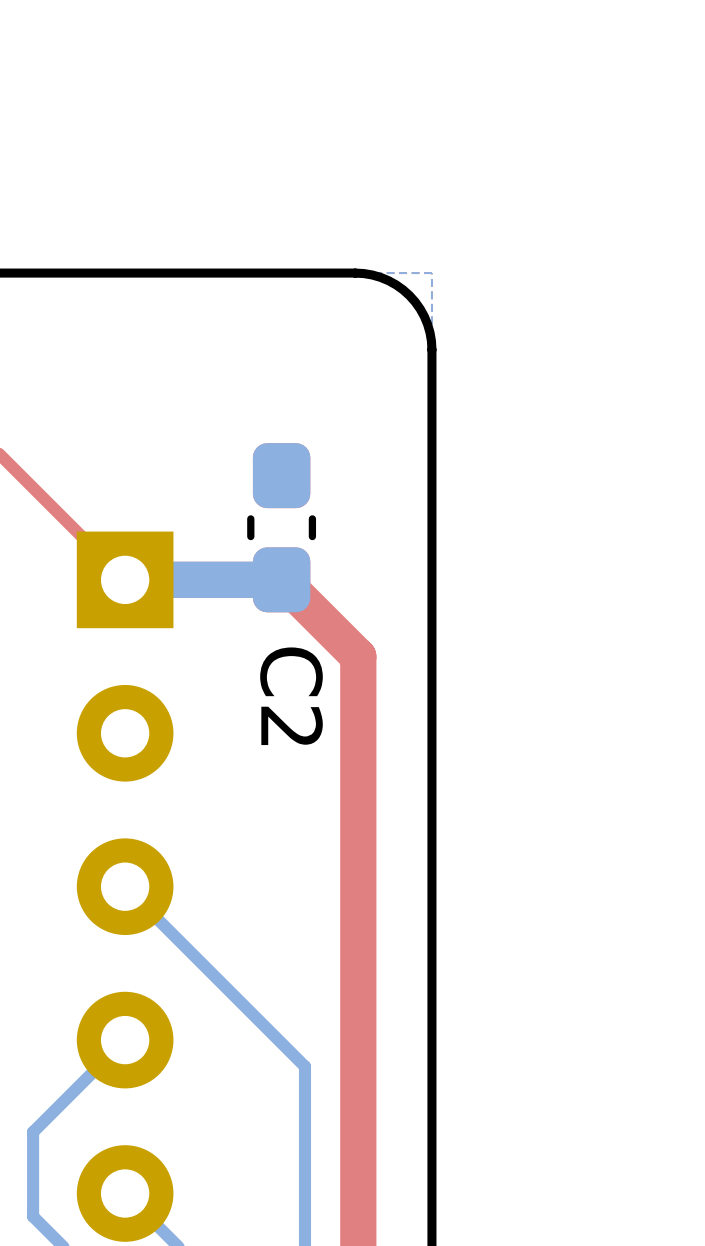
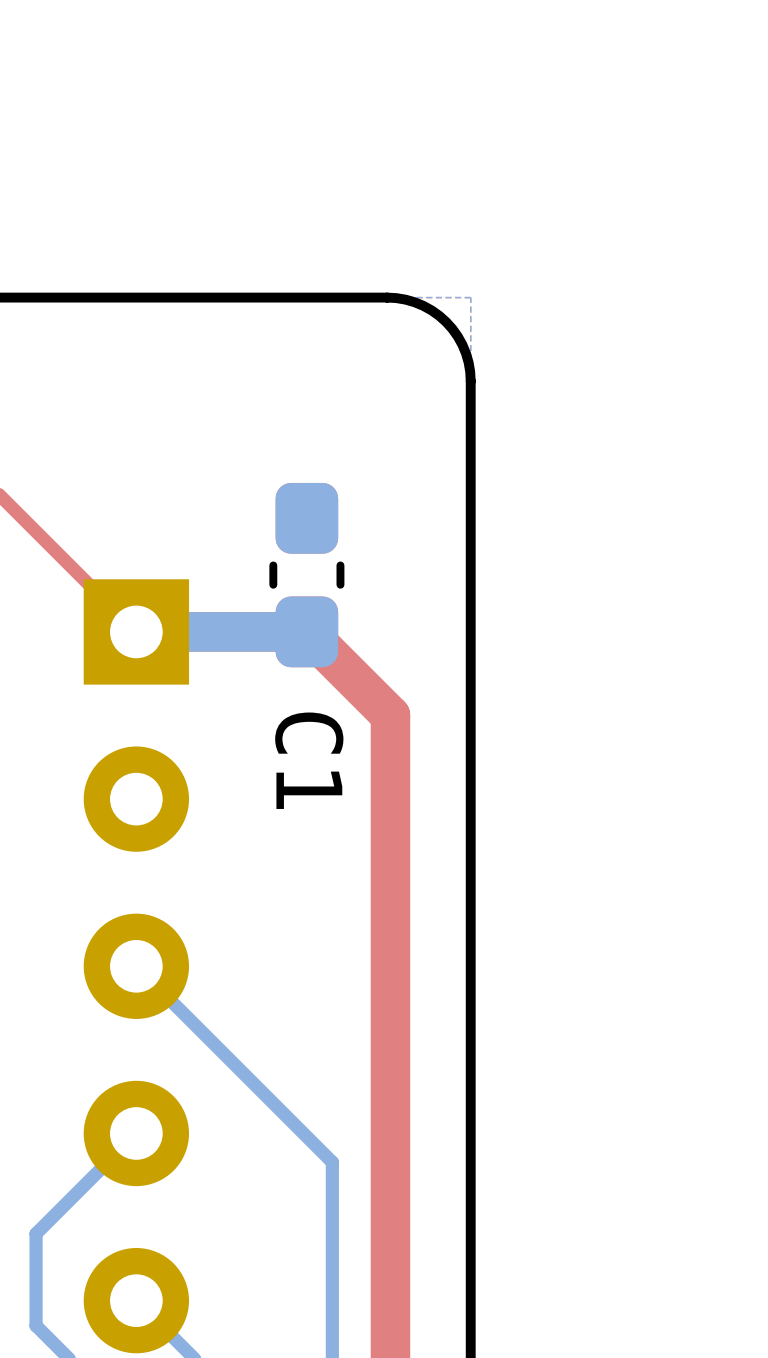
C2 name: C2 (291, 696) -> C1 (309, 760)

